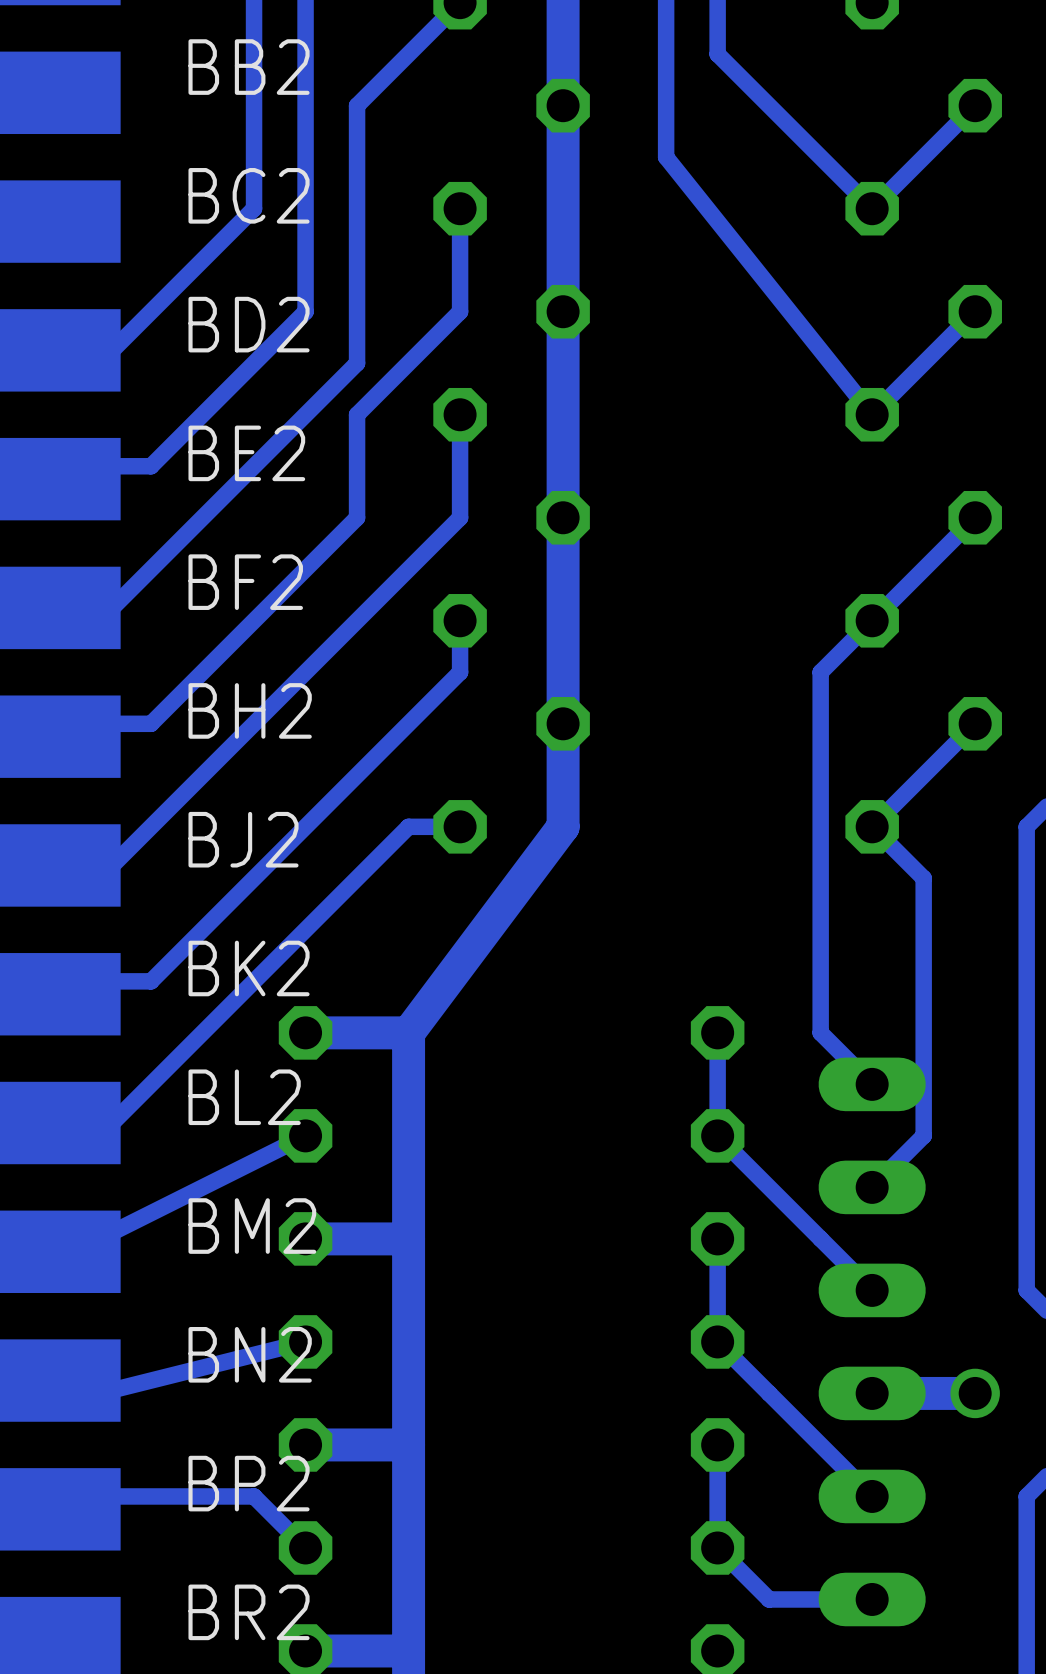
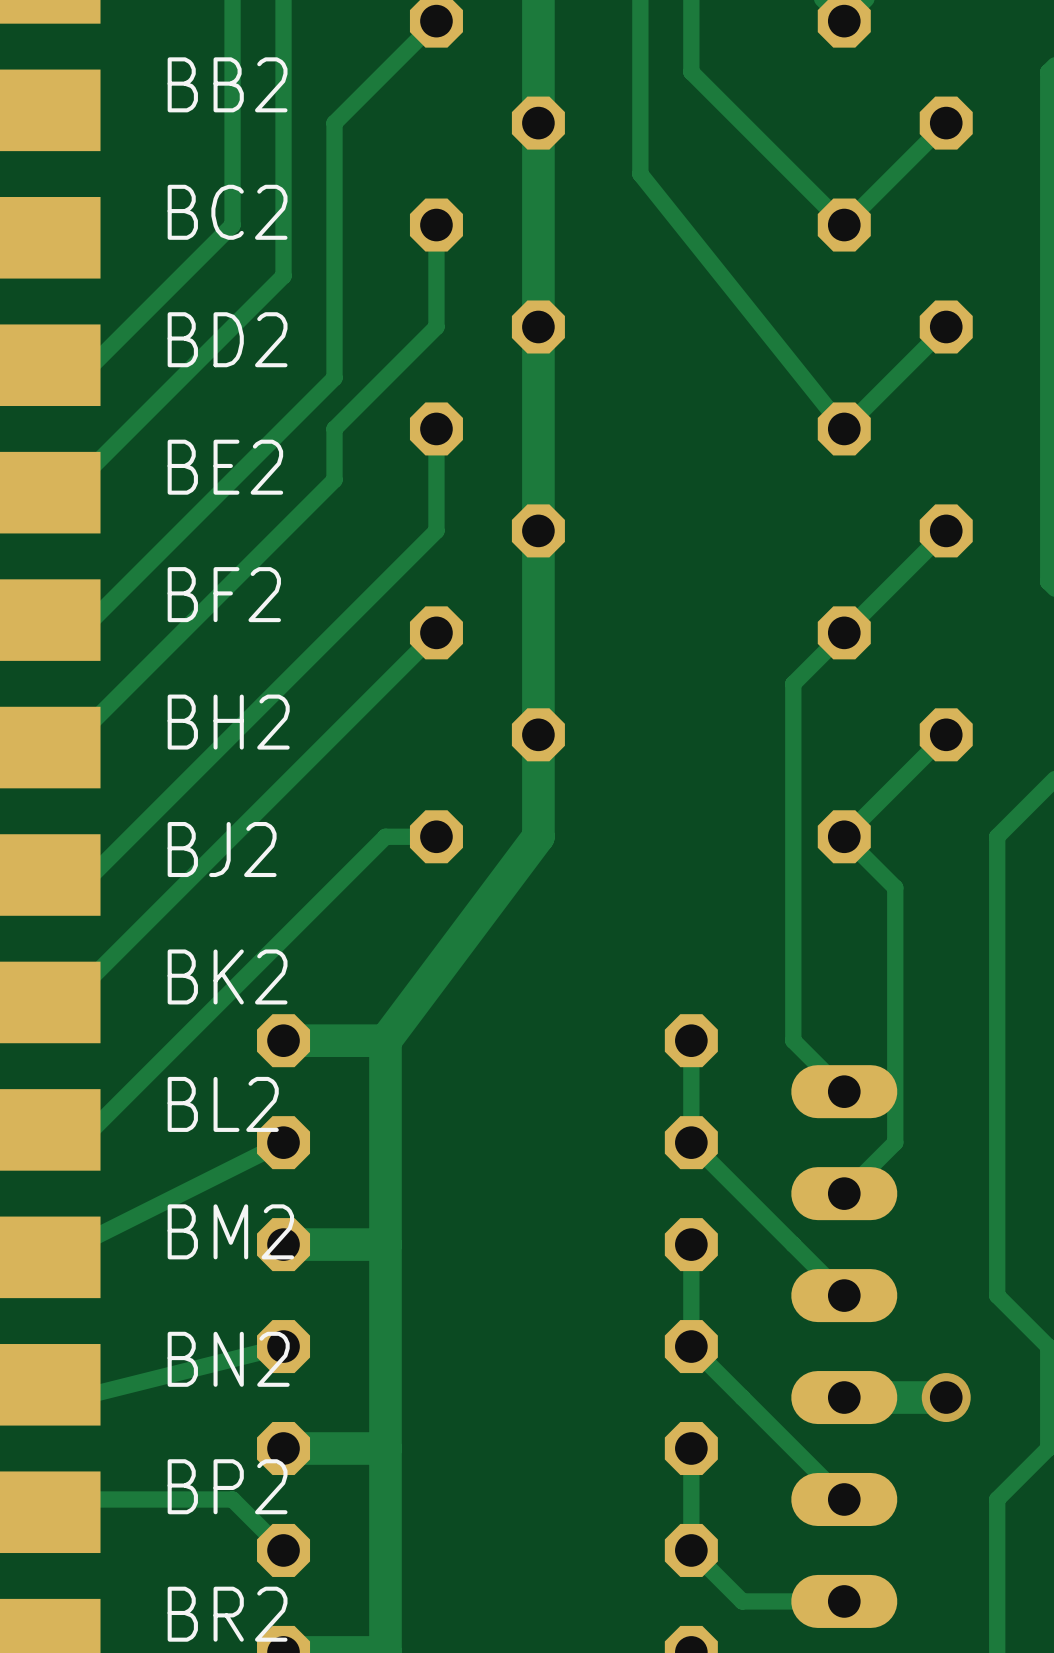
track: (305, 260) (305, 311) (151, 466) (99, 466) -> (283, 276) (79, 479)
track: (357, 466) (357, 517) (151, 723) (99, 723) -> (334, 479) (79, 734)
track: (460, 620) (460, 672) (151, 981) (99, 981) -> (436, 632) (79, 989)

